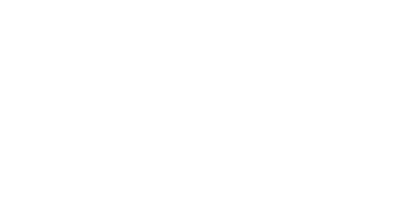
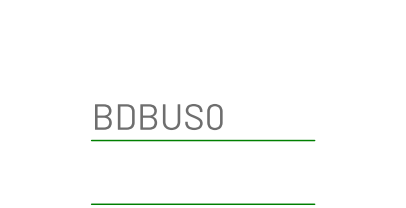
label: none -> BDBUS0 (158, 117)
wire: none -> (91, 140) (314, 140)
wire: none -> (91, 204) (314, 204)

